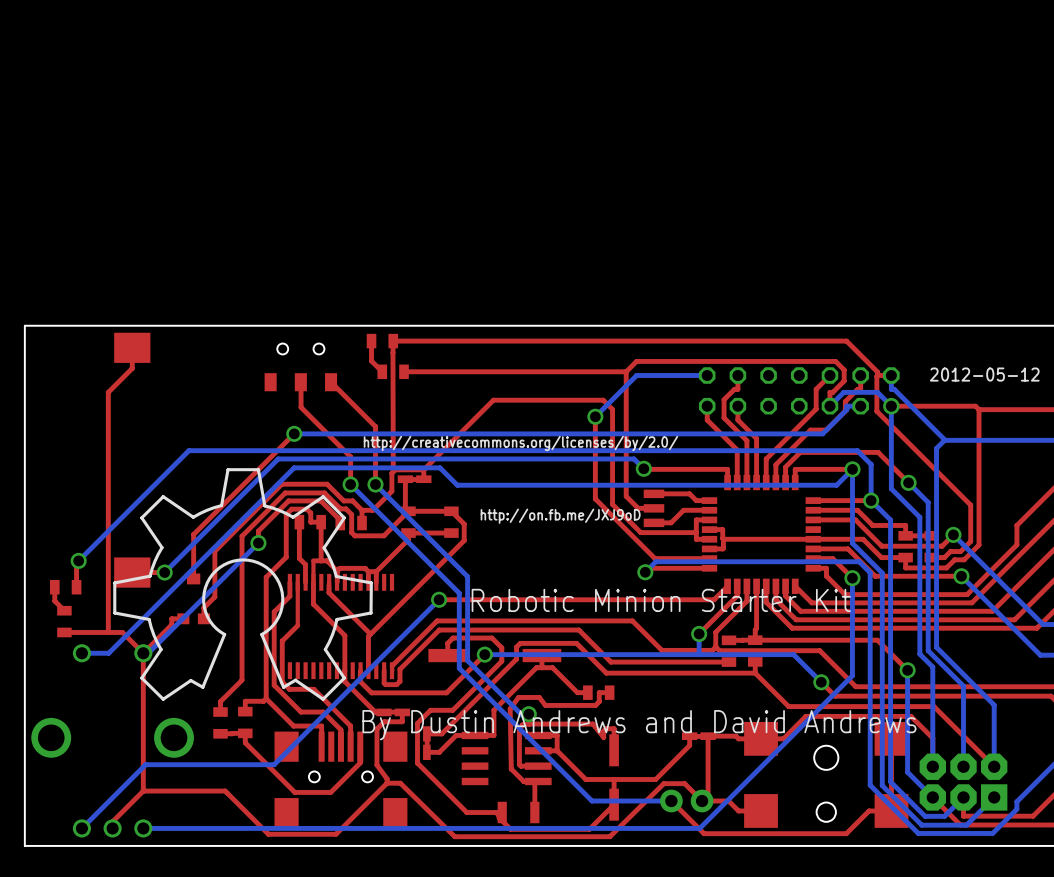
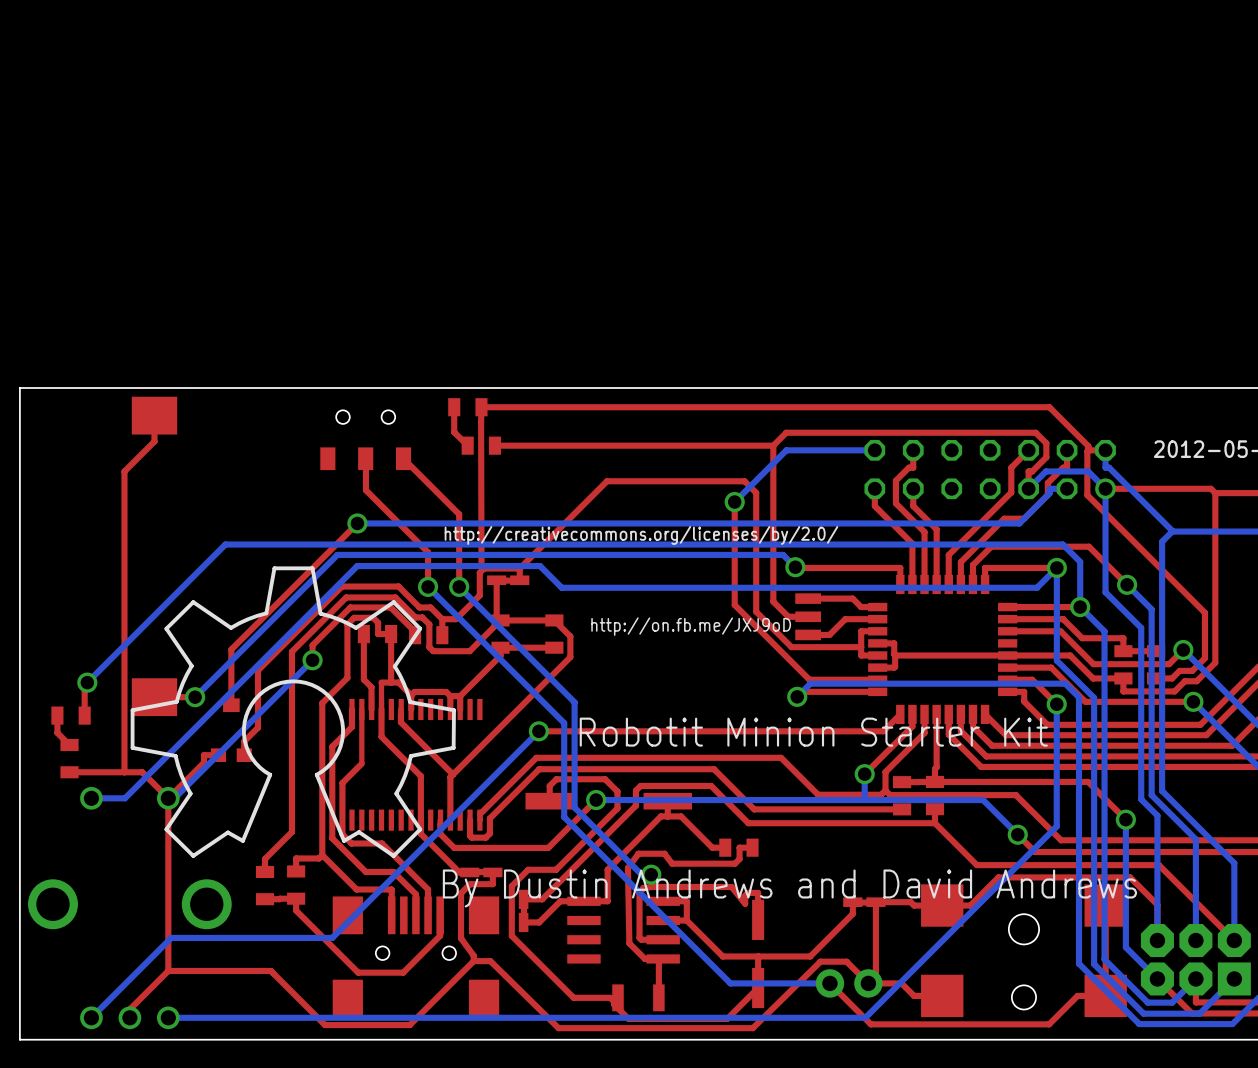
text: Robotic Minion Starter Kit (661, 600) -> Robotit Minion Starter Kit (813, 732)

